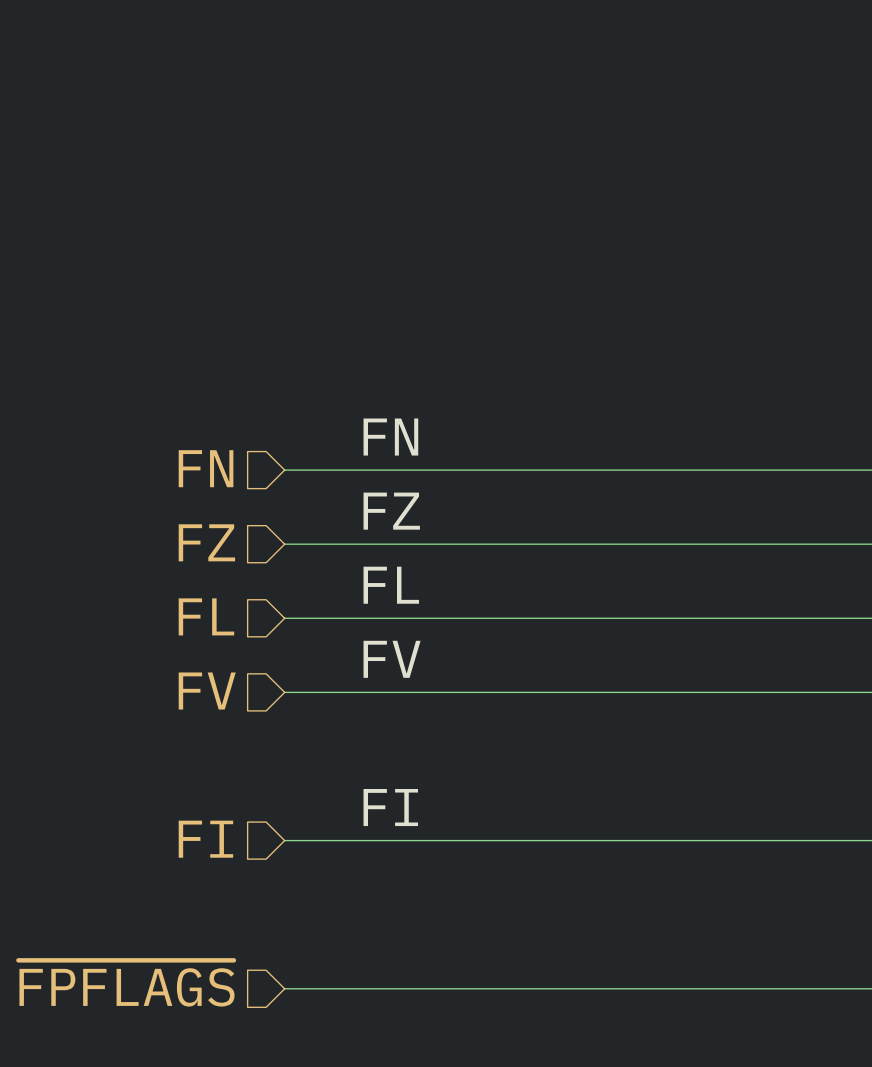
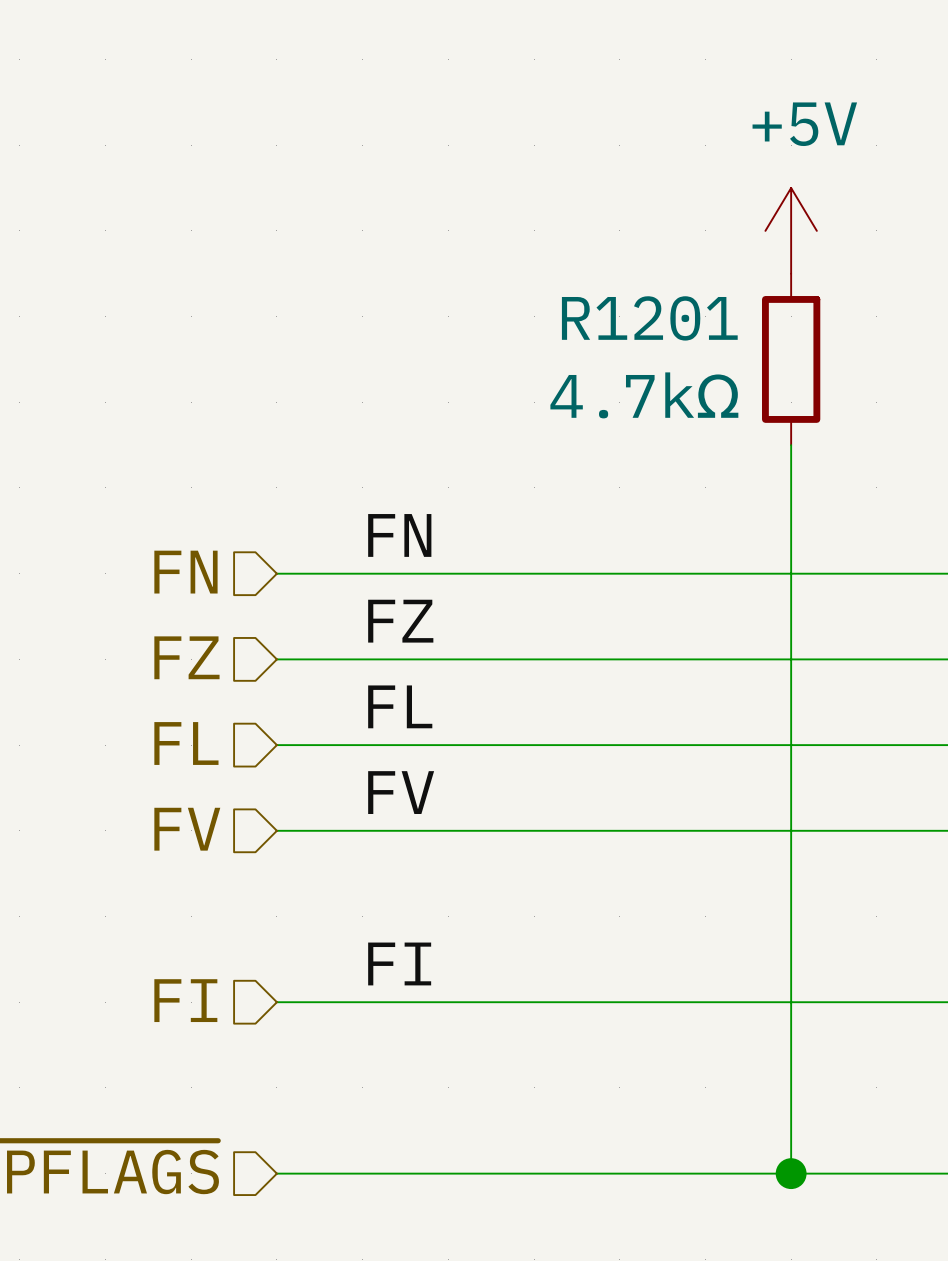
power symbol: none -> +5V (791, 230)
R1201: none -> 4.7kΩ (791, 359)
wire: none -> (791, 445) (791, 1173)
junction: none -> (791, 1173)

